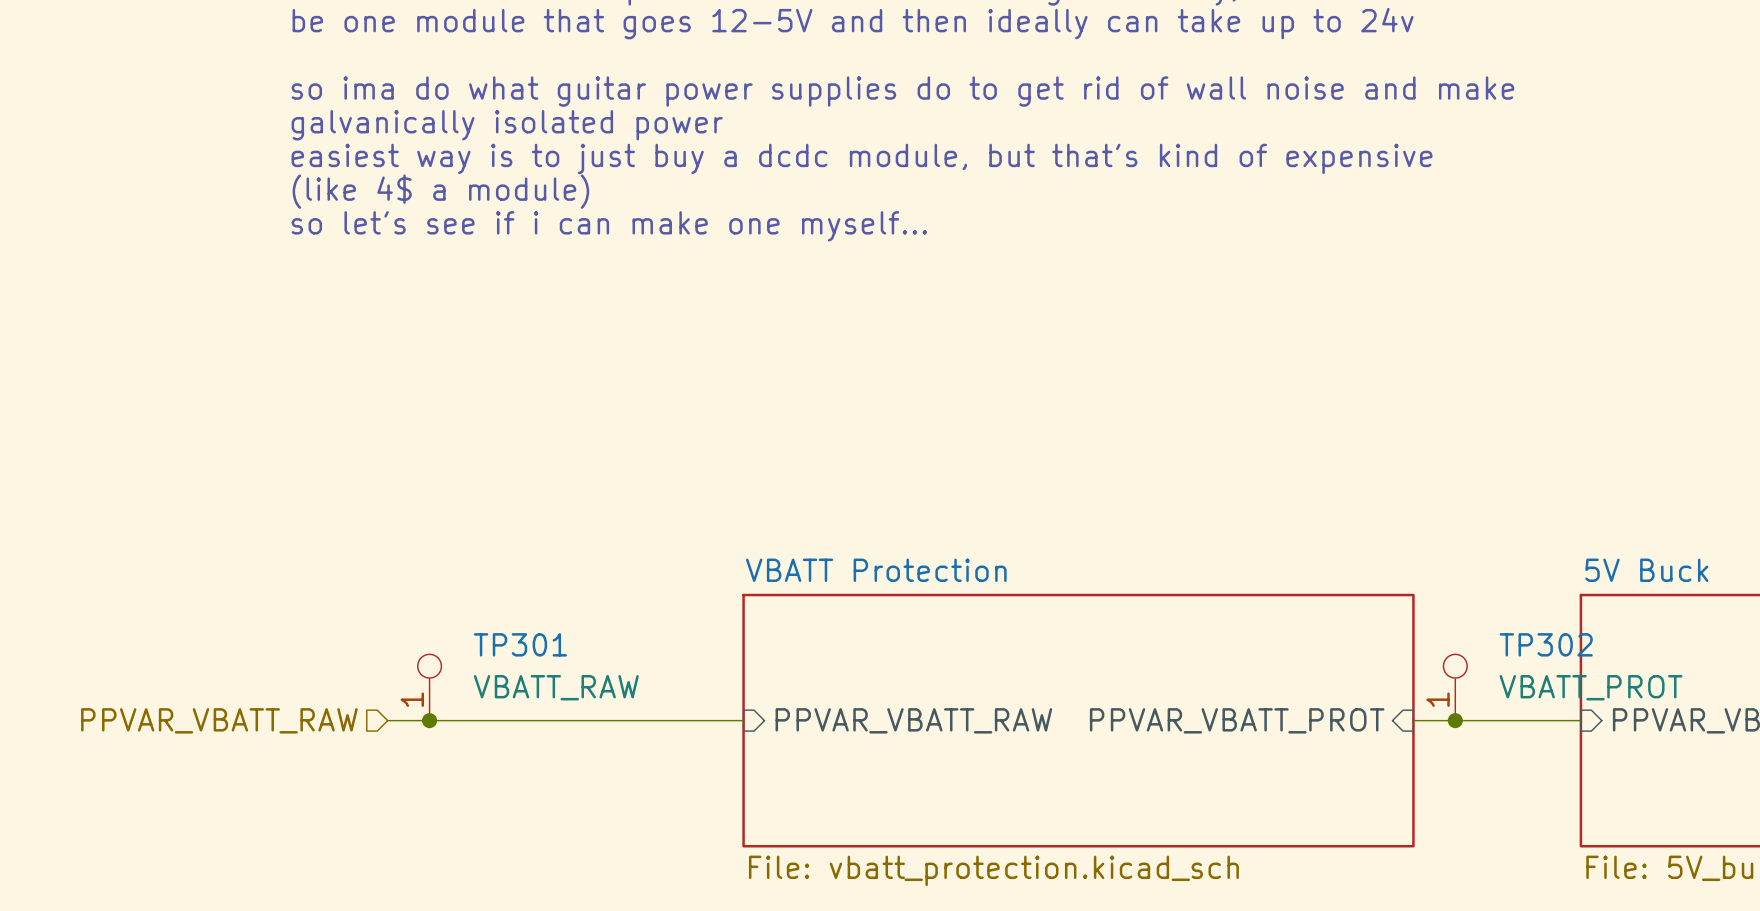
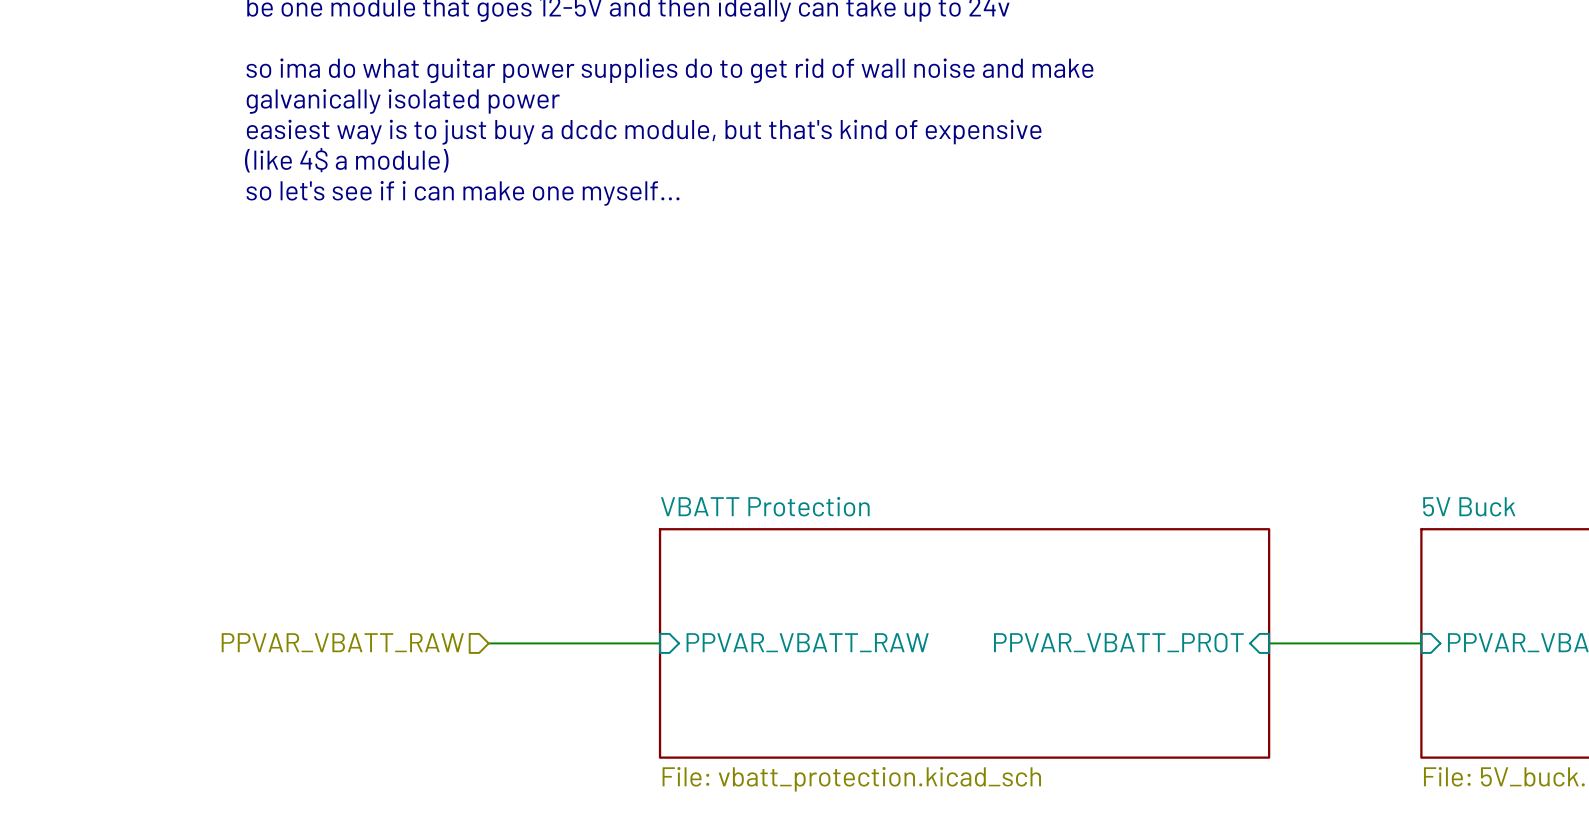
TP301: VBATT_RAW (429, 687) -> none
TP302: VBATT_PROT (1455, 687) -> none
hierarchical label position: PPVAR_VBATT_RAW (219, 720) -> PPVAR_VBATT_RAW (342, 642)
wire: (387, 720) (555, 720) -> none
junction: (429, 720) -> none
junction: (1455, 720) -> none

